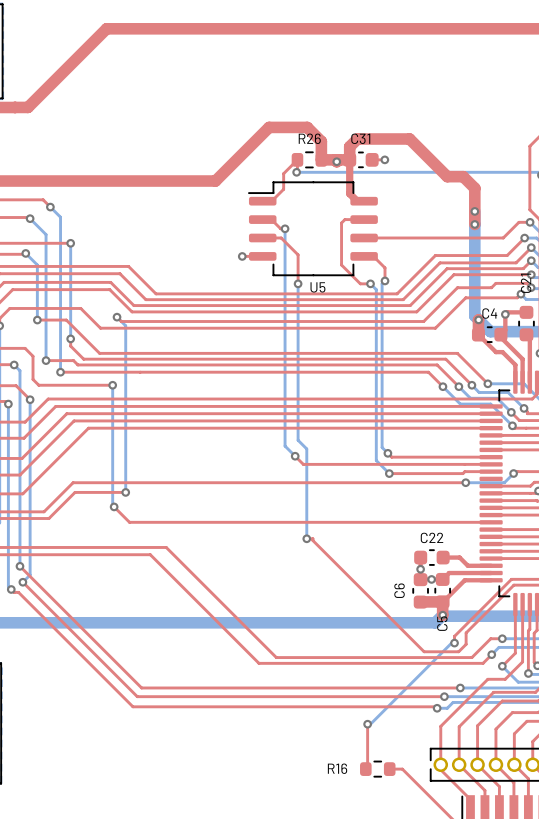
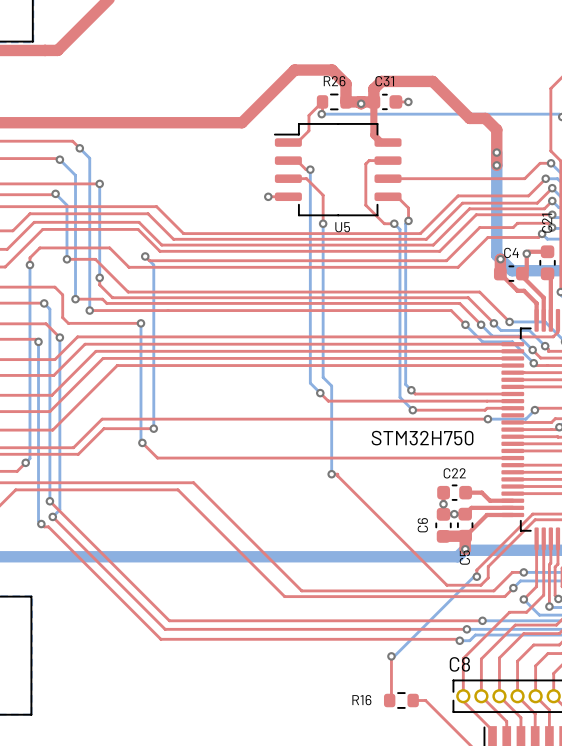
text: none -> STM32H750 (422, 438)
text: none -> C8 (459, 664)

